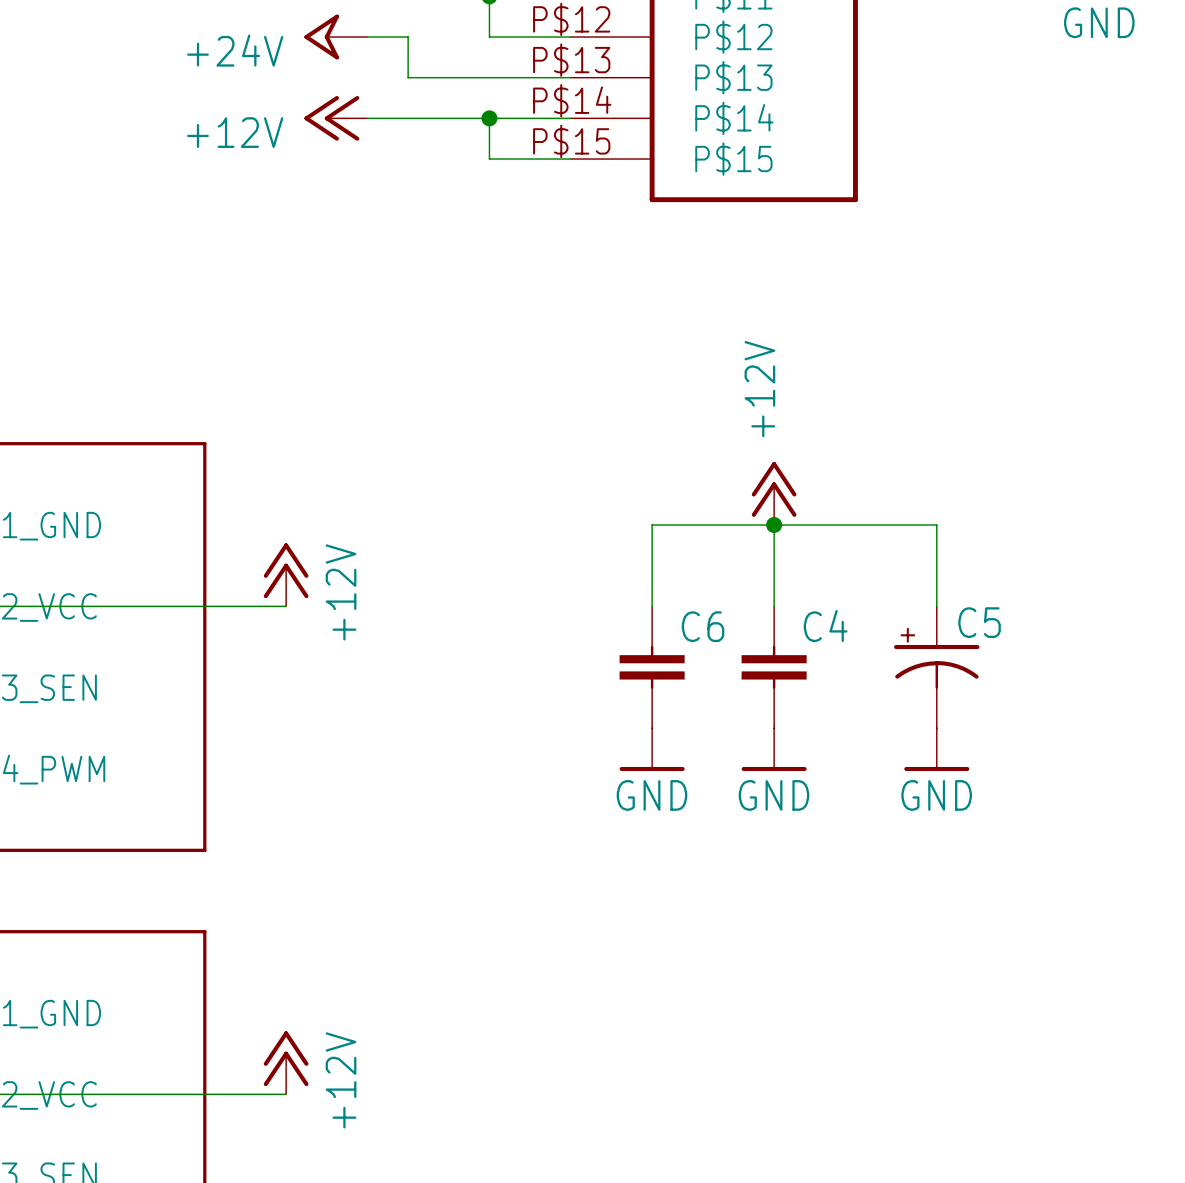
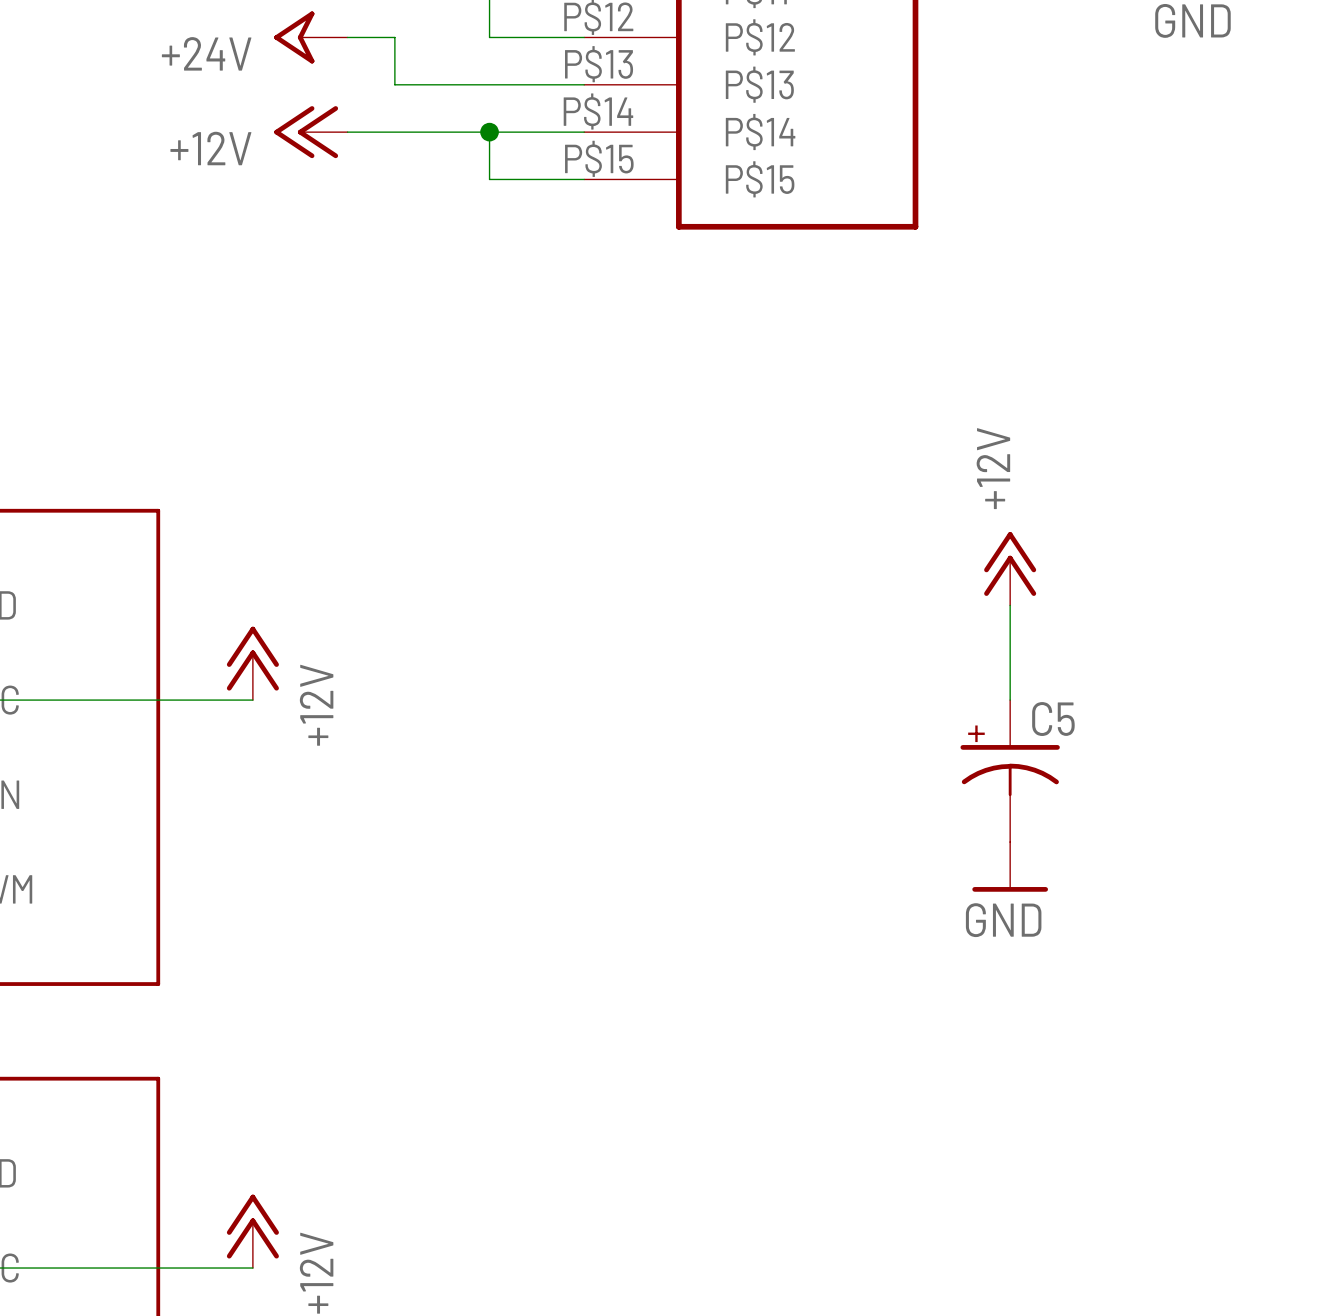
power symbol position: +12V (774, 493) -> +12V (1010, 568)
wire: (774, 525) (774, 606) -> none
junction: (774, 525) -> none
wire: (936, 525) (652, 525) (652, 606) -> none
C6: (652, 667) -> none
C4: (774, 667) -> none
power symbol: GND (652, 749) -> none
power symbol: GND (774, 749) -> none

